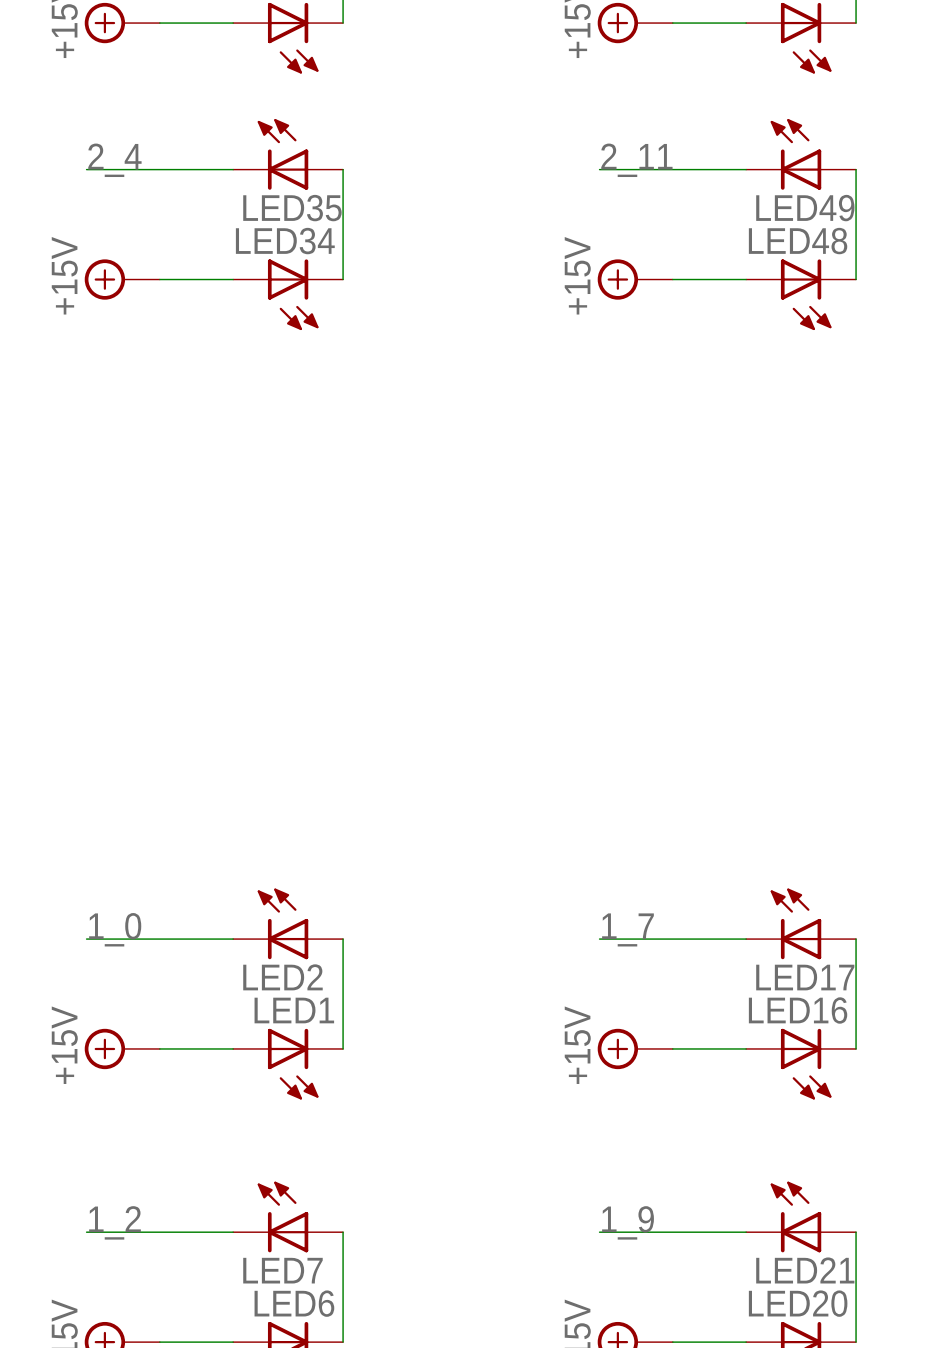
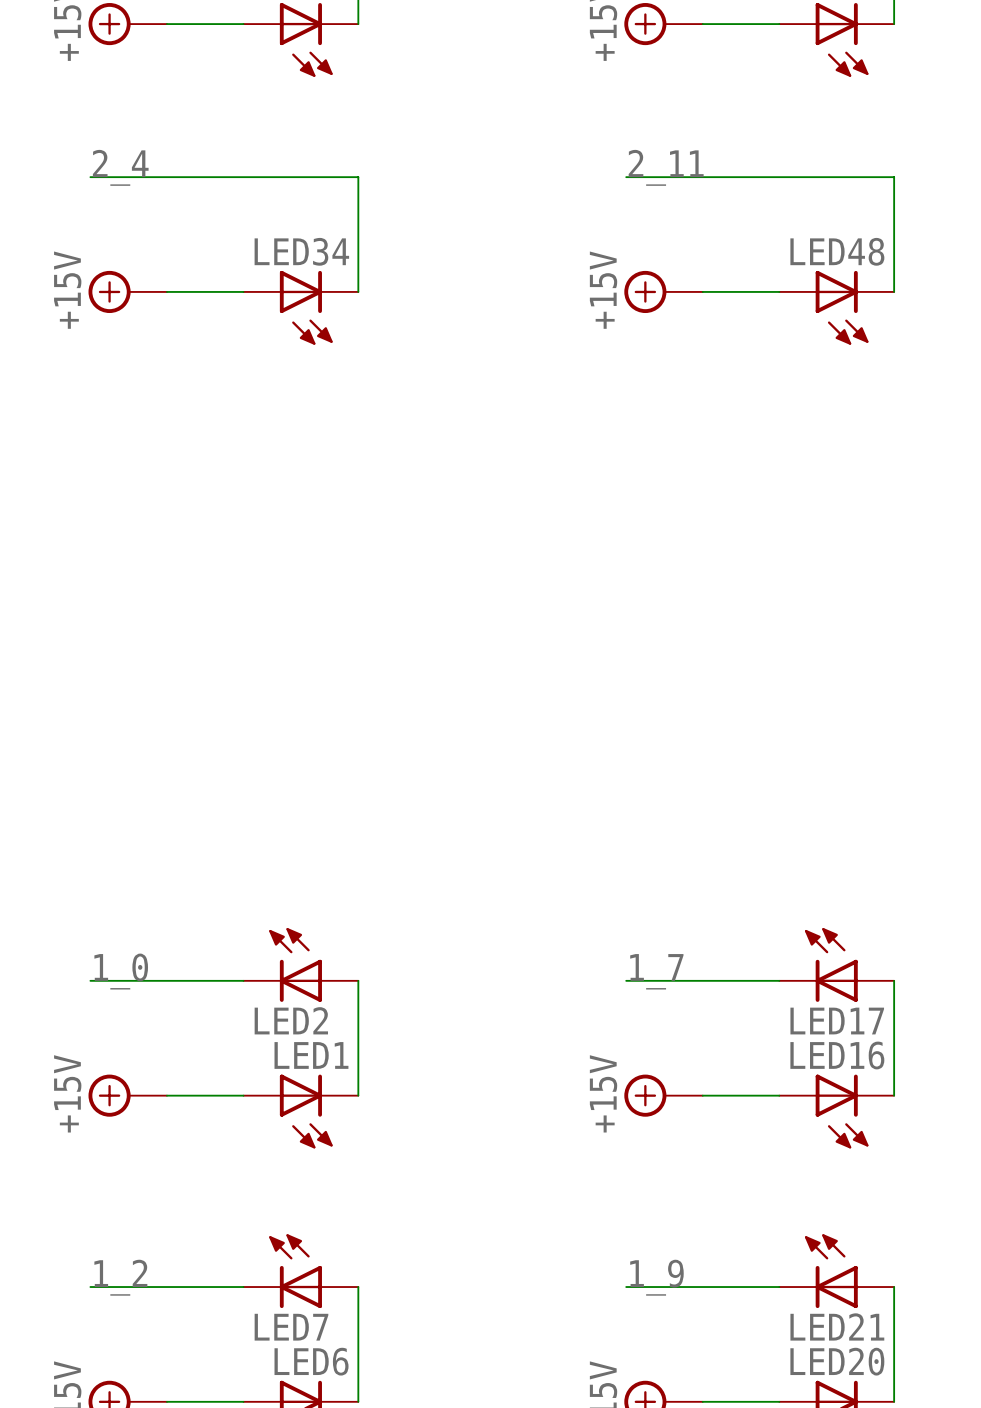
LED35: (288, 154) -> none
LED49: (801, 154) -> none

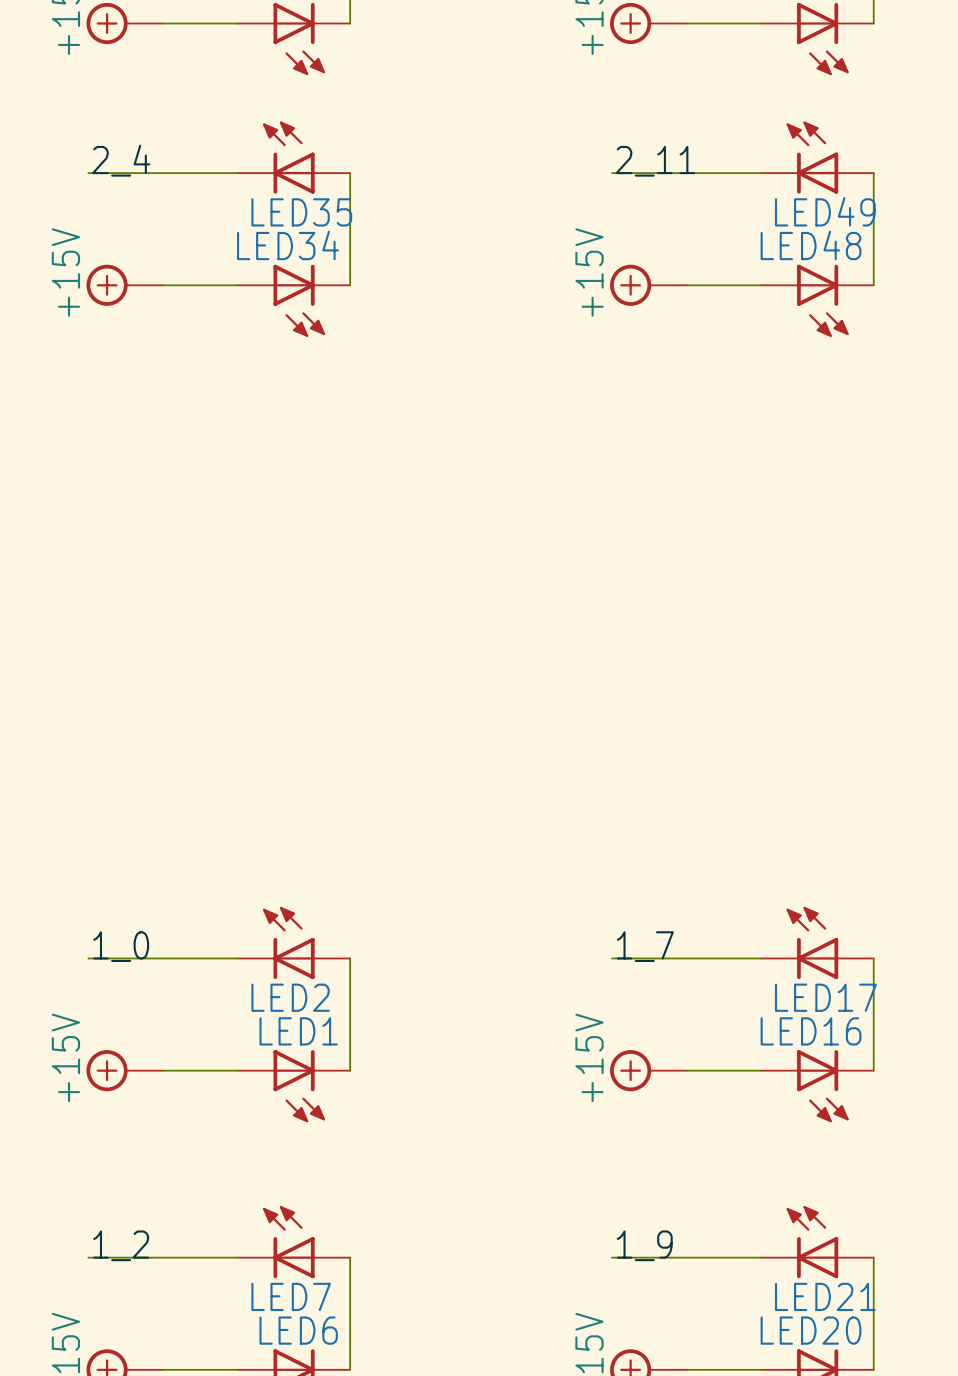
LED35: none -> (294, 157)
LED49: none -> (817, 157)

